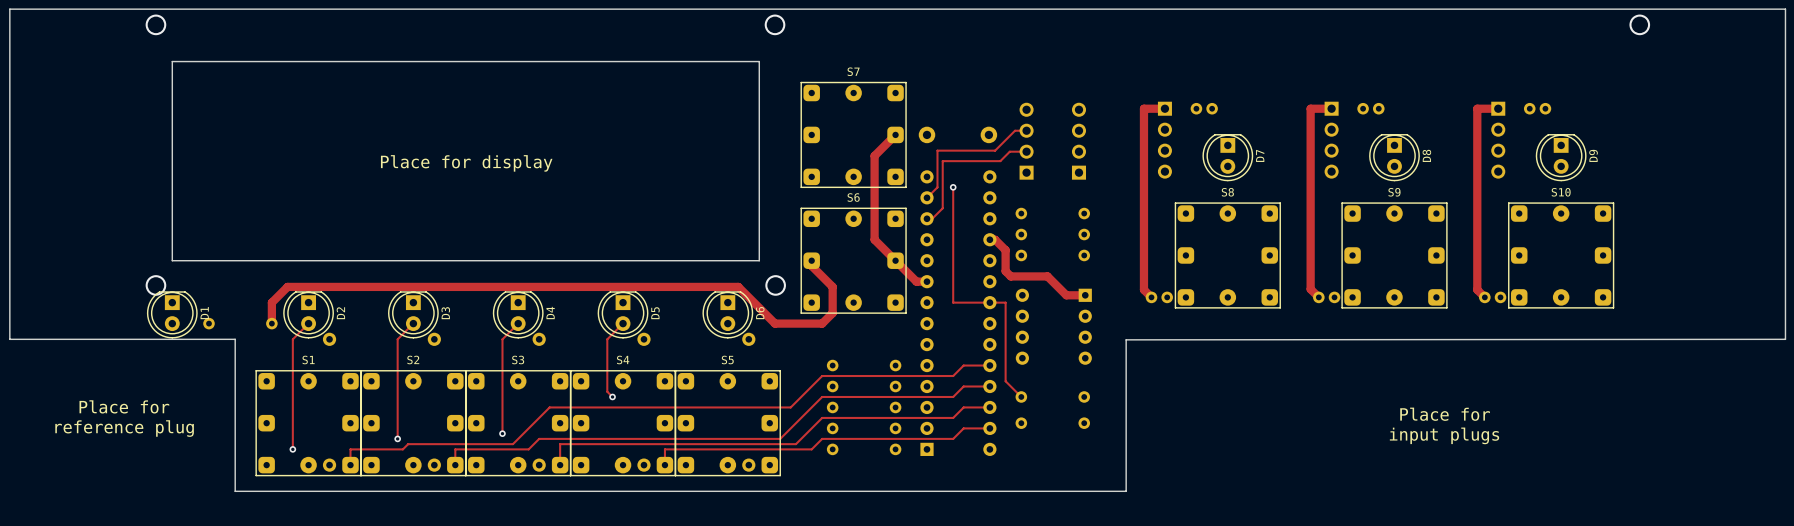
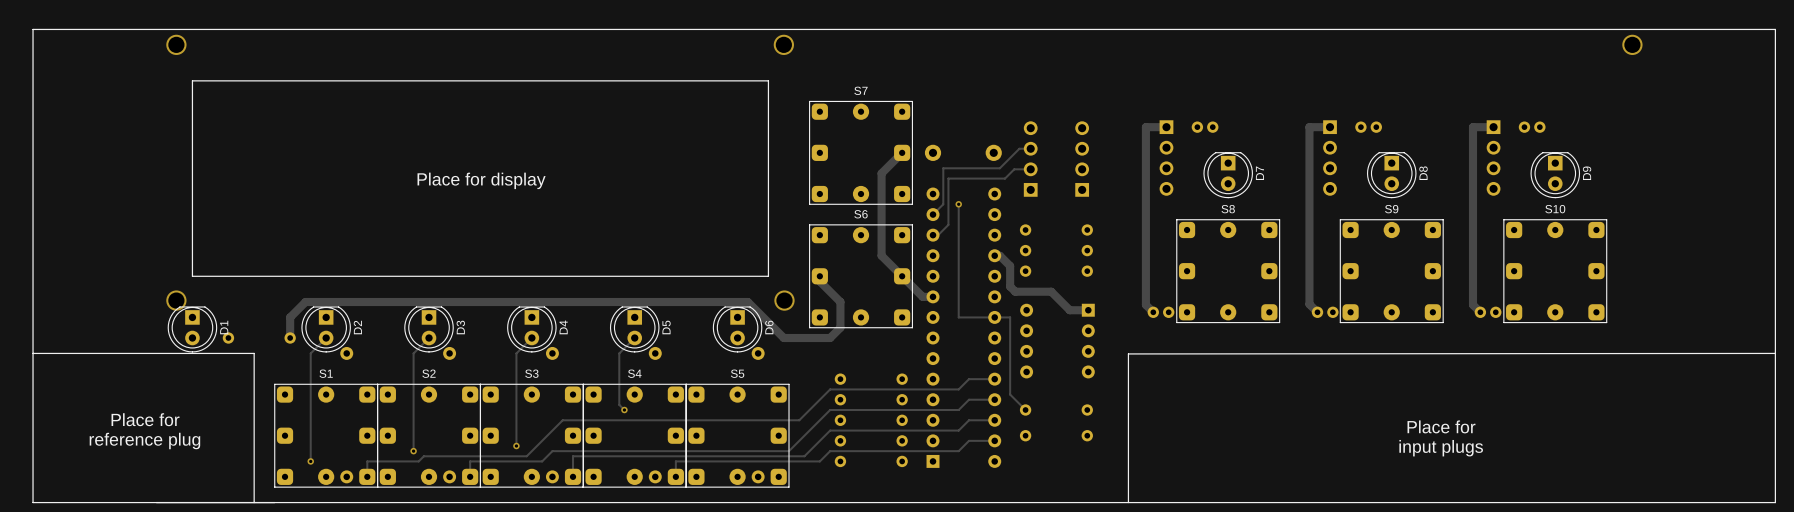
board edge: (9, 9) (9, 339) (235, 339) (235, 491) (1126, 491) (1126, 339) (1785, 339) (1785, 9) (9, 9) -> none
line: none -> (33, 29) (33, 502) (1775, 502) (1775, 29) (33, 29)
board edge: (172, 61) (172, 260) (759, 260) (759, 61) (172, 61) -> none
line: none -> (192, 80) (192, 276) (768, 276) (768, 80) (192, 80)
line: none -> (33, 353) (254, 353) (254, 502)
line: none -> (1775, 353) (1128, 353) (1128, 502)

